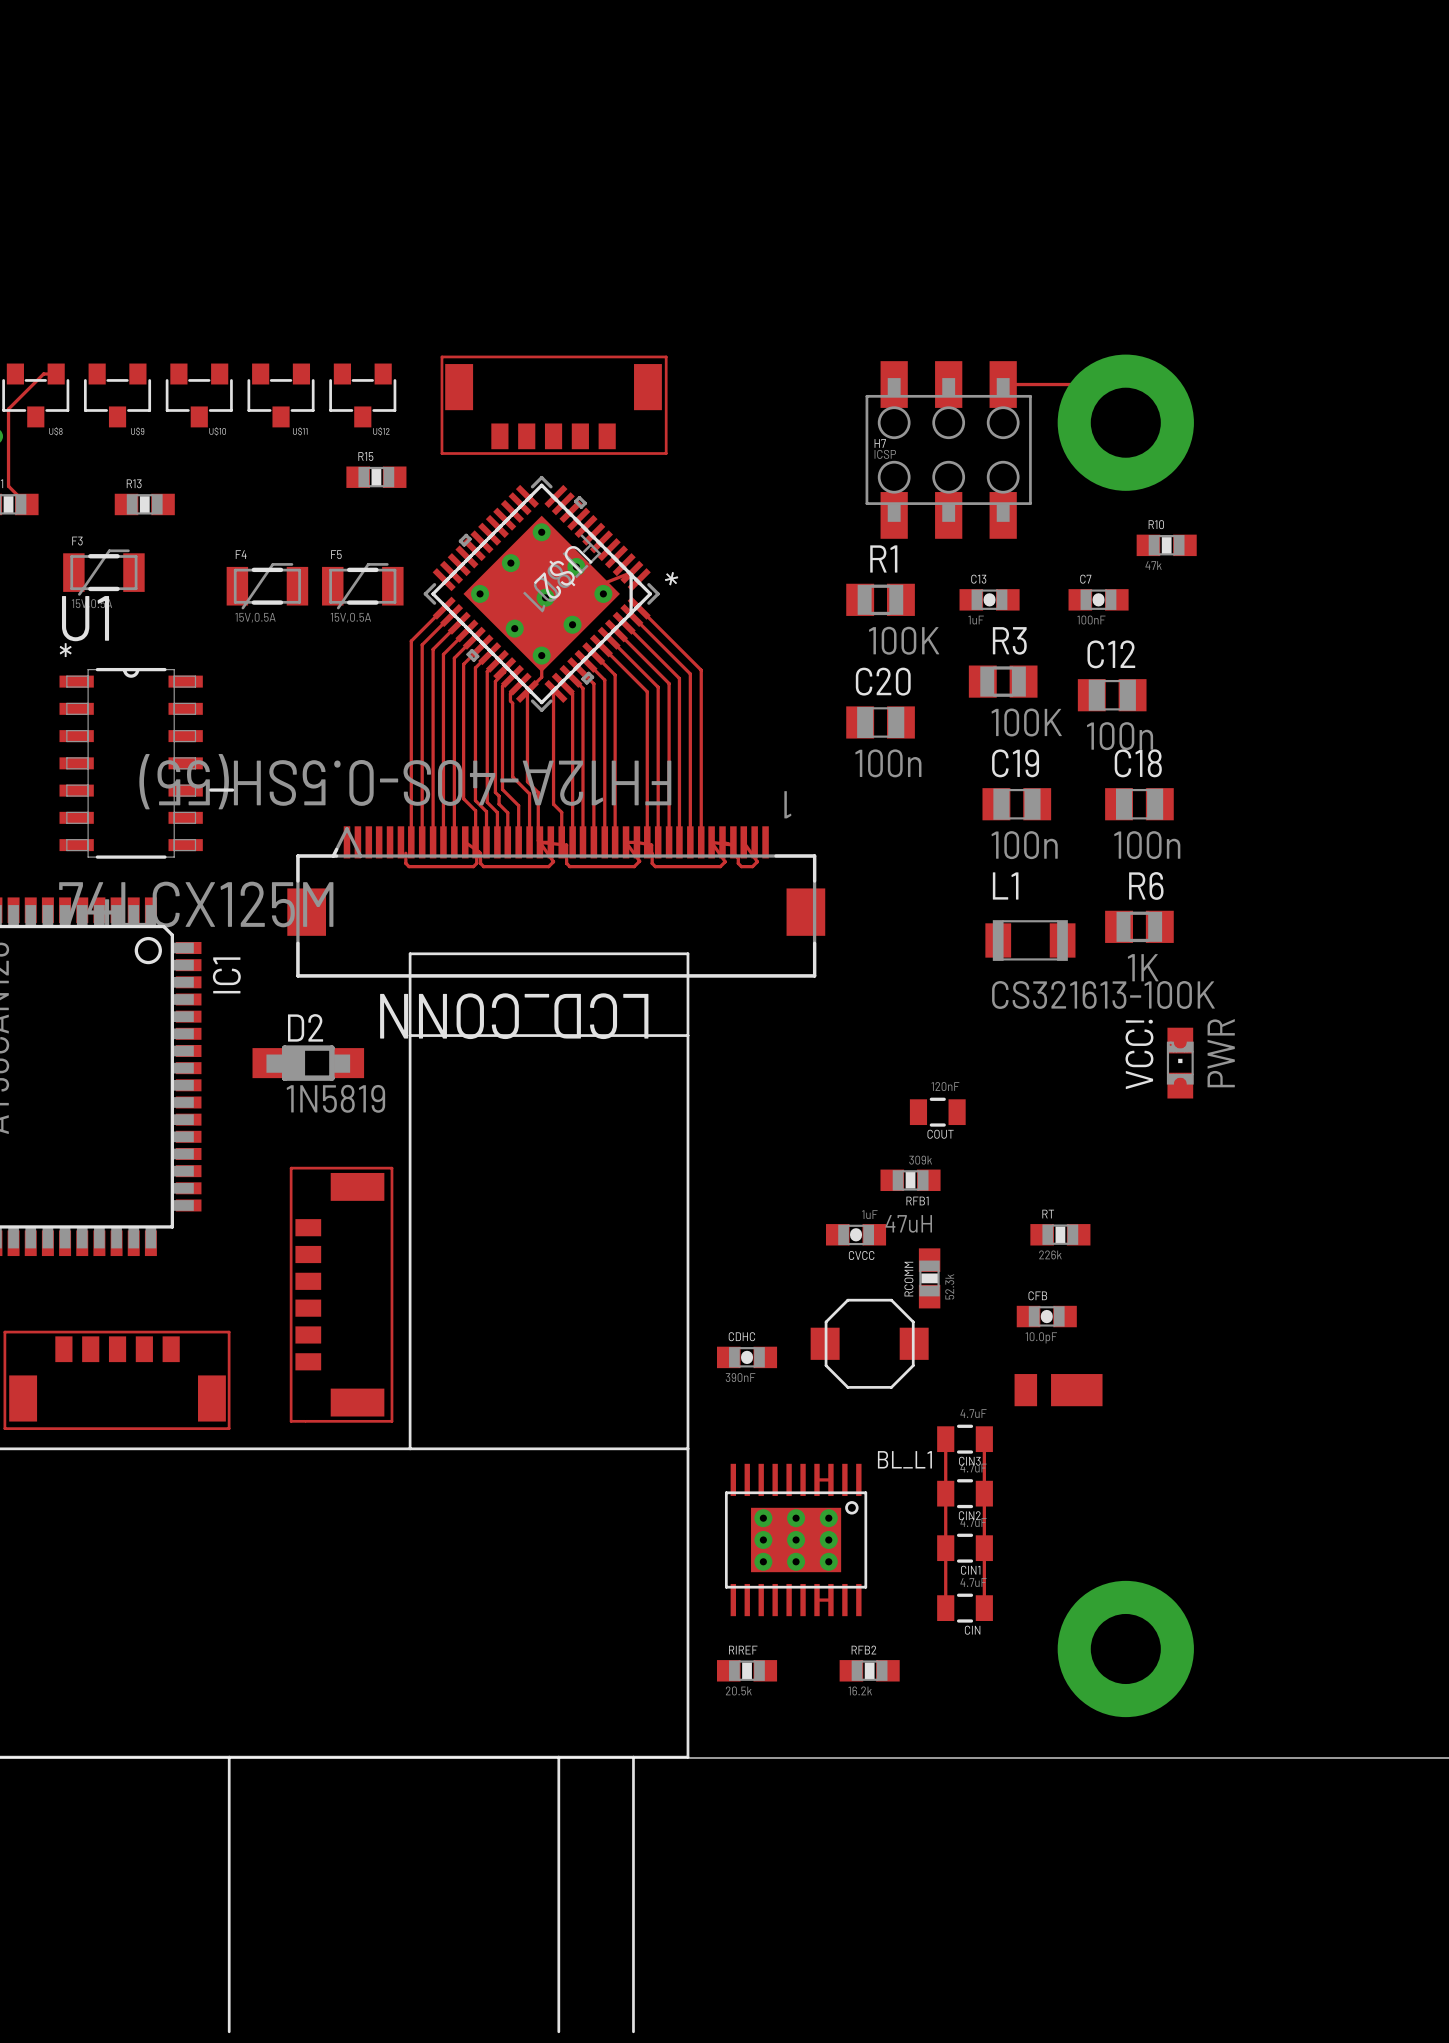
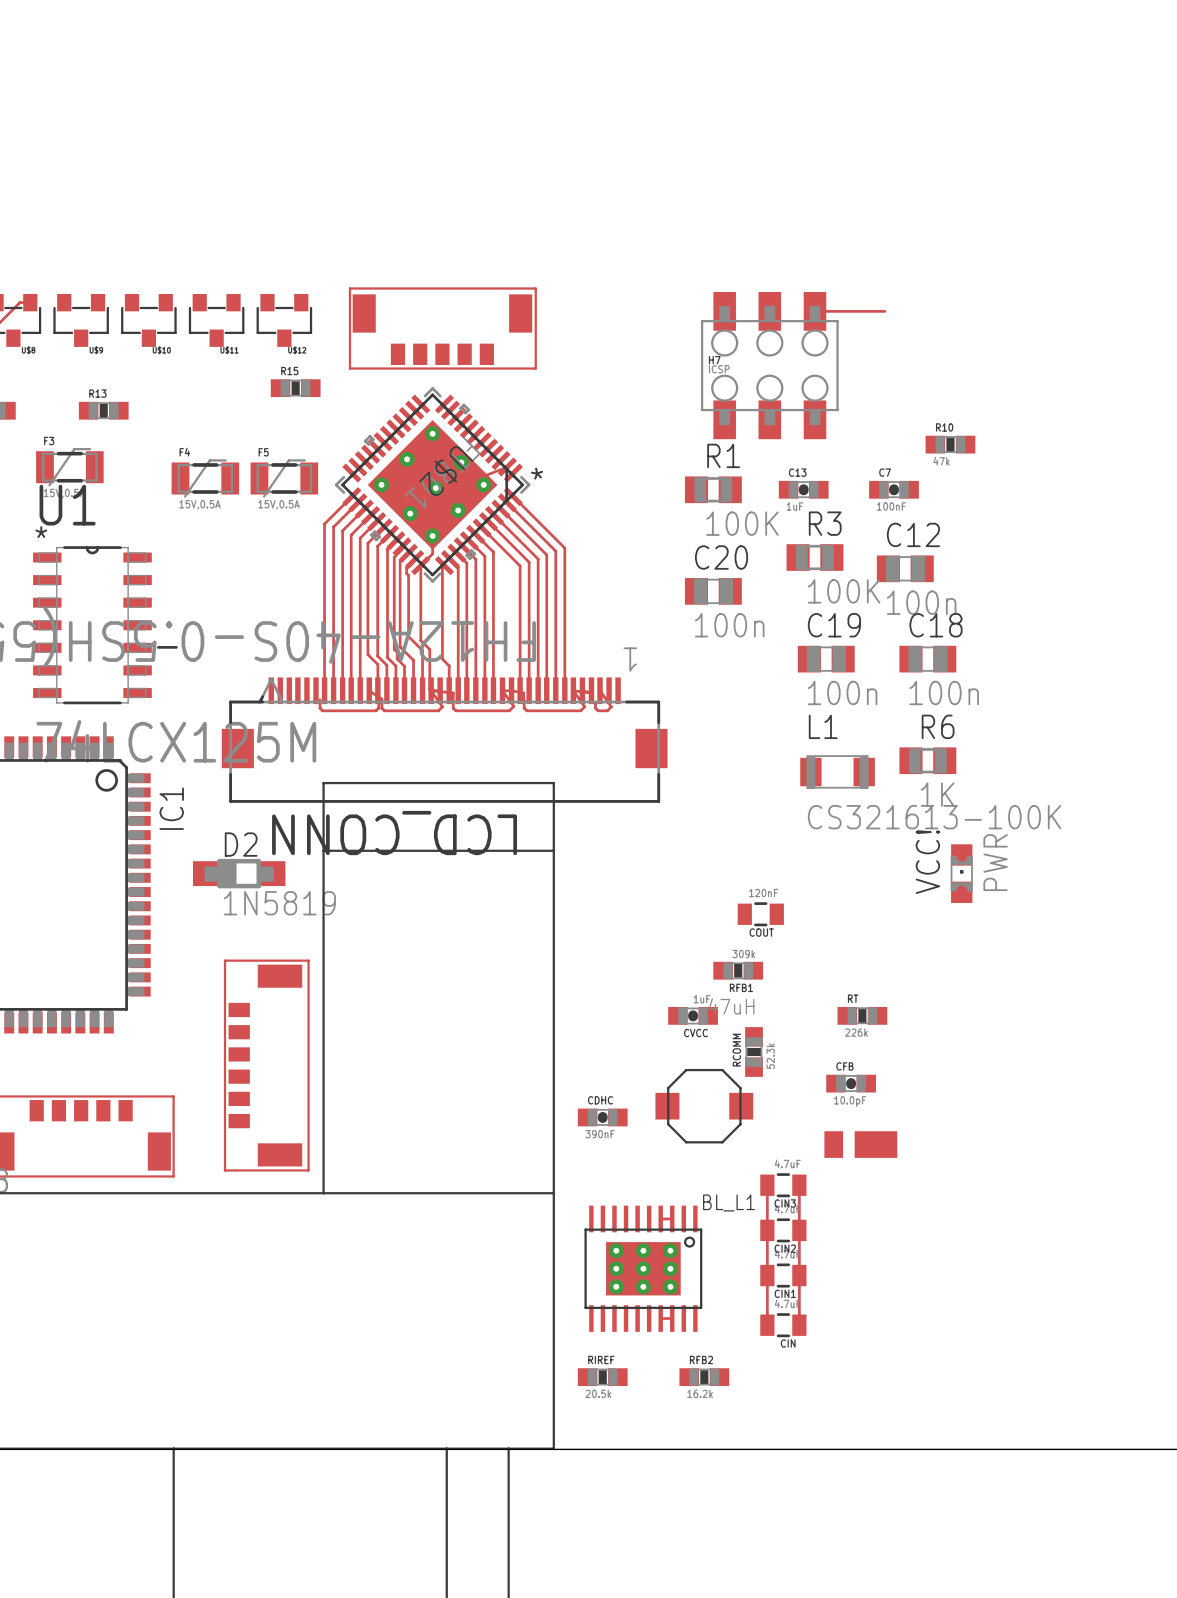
part: (1125, 422) -> none
part: (1125, 1648) -> none

